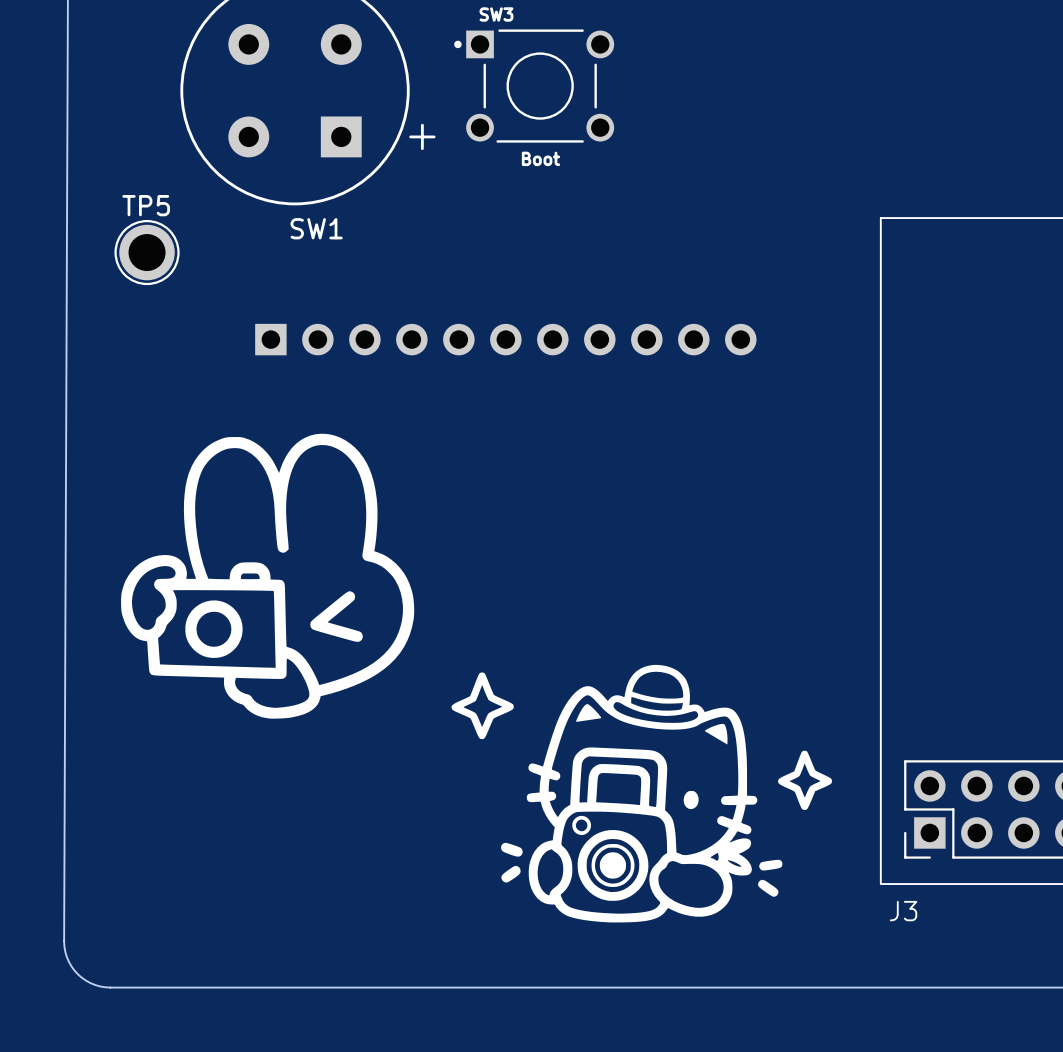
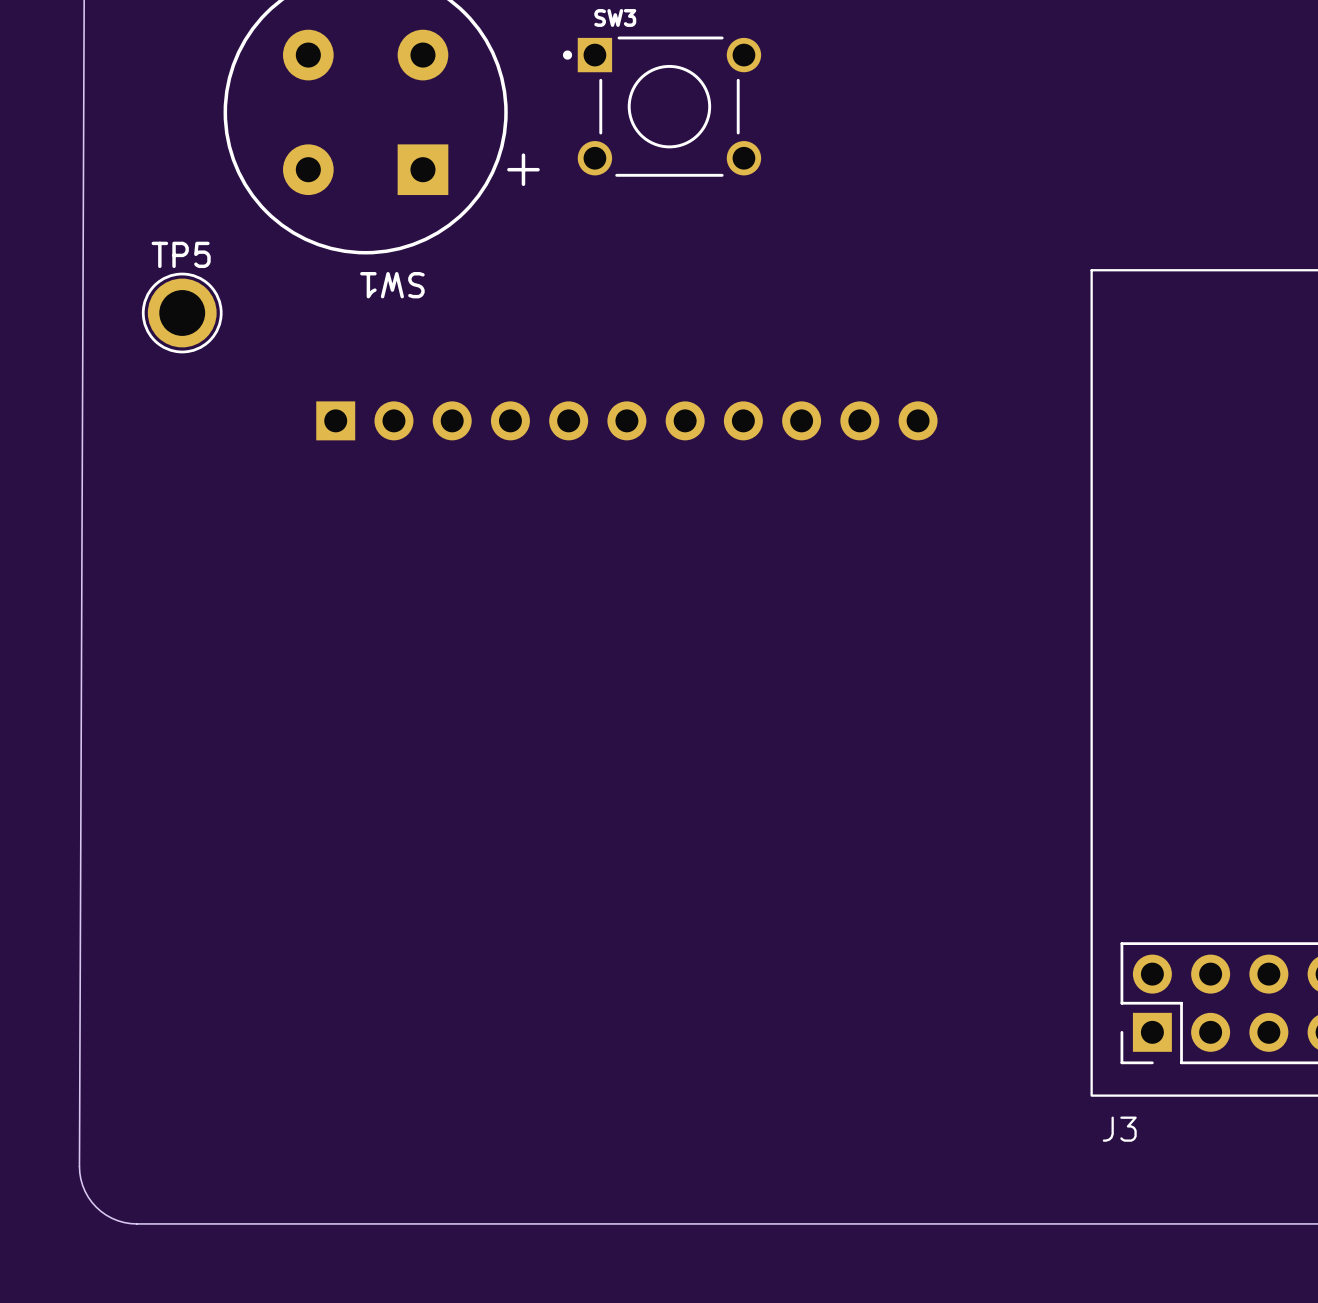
SW3 value: Boot (540, 158) -> none
SW1 name rotation: 0° (316, 228) -> 180° (392, 285)
drawing: [121, 433, 415, 719] -> none
drawing: [451, 664, 833, 923] -> none

